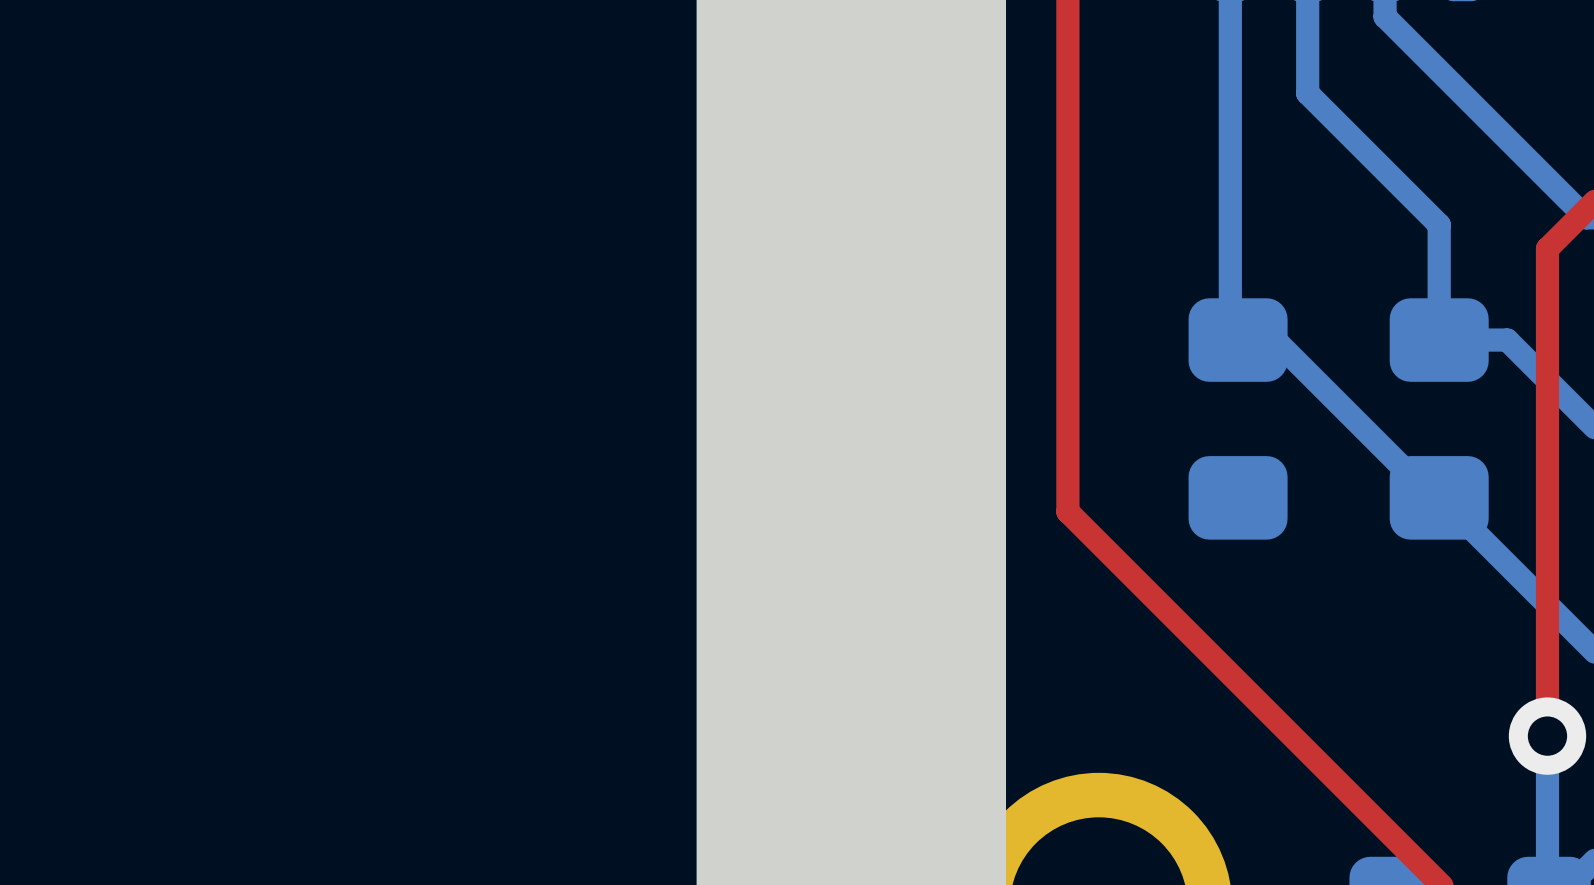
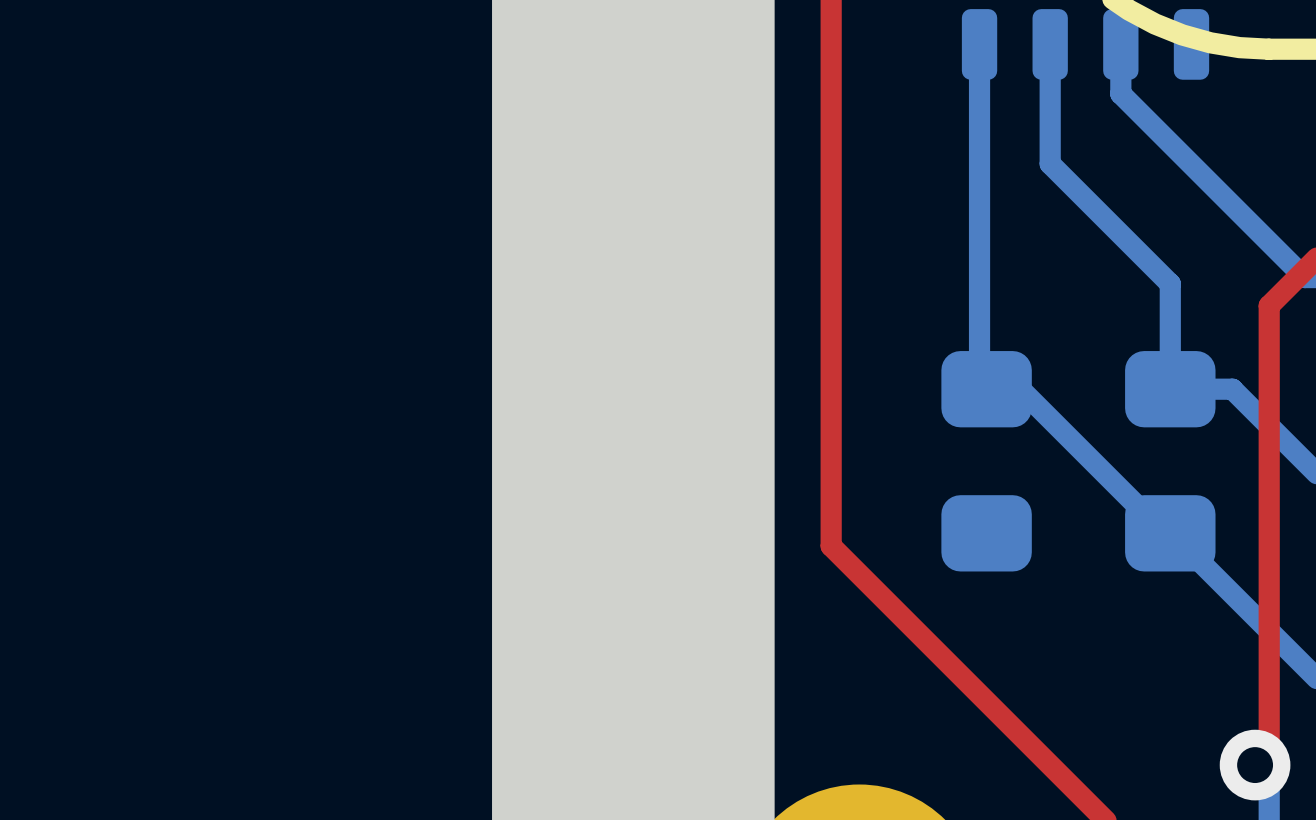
via position: (1547, 736) -> (1255, 765)

